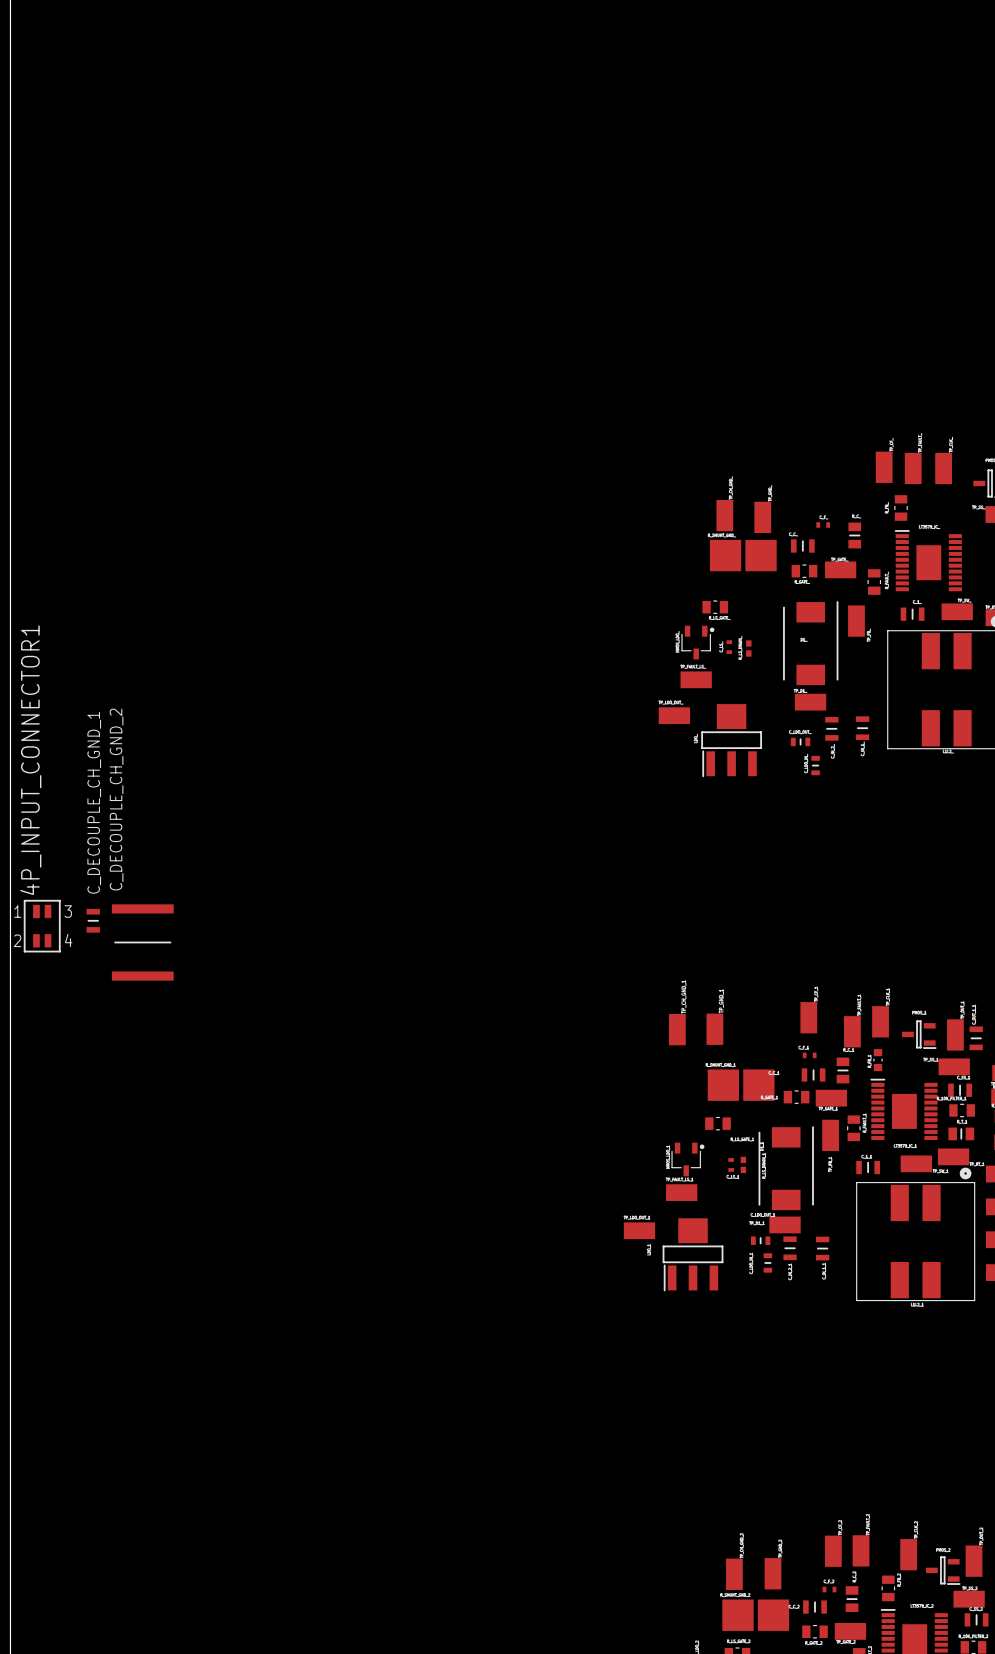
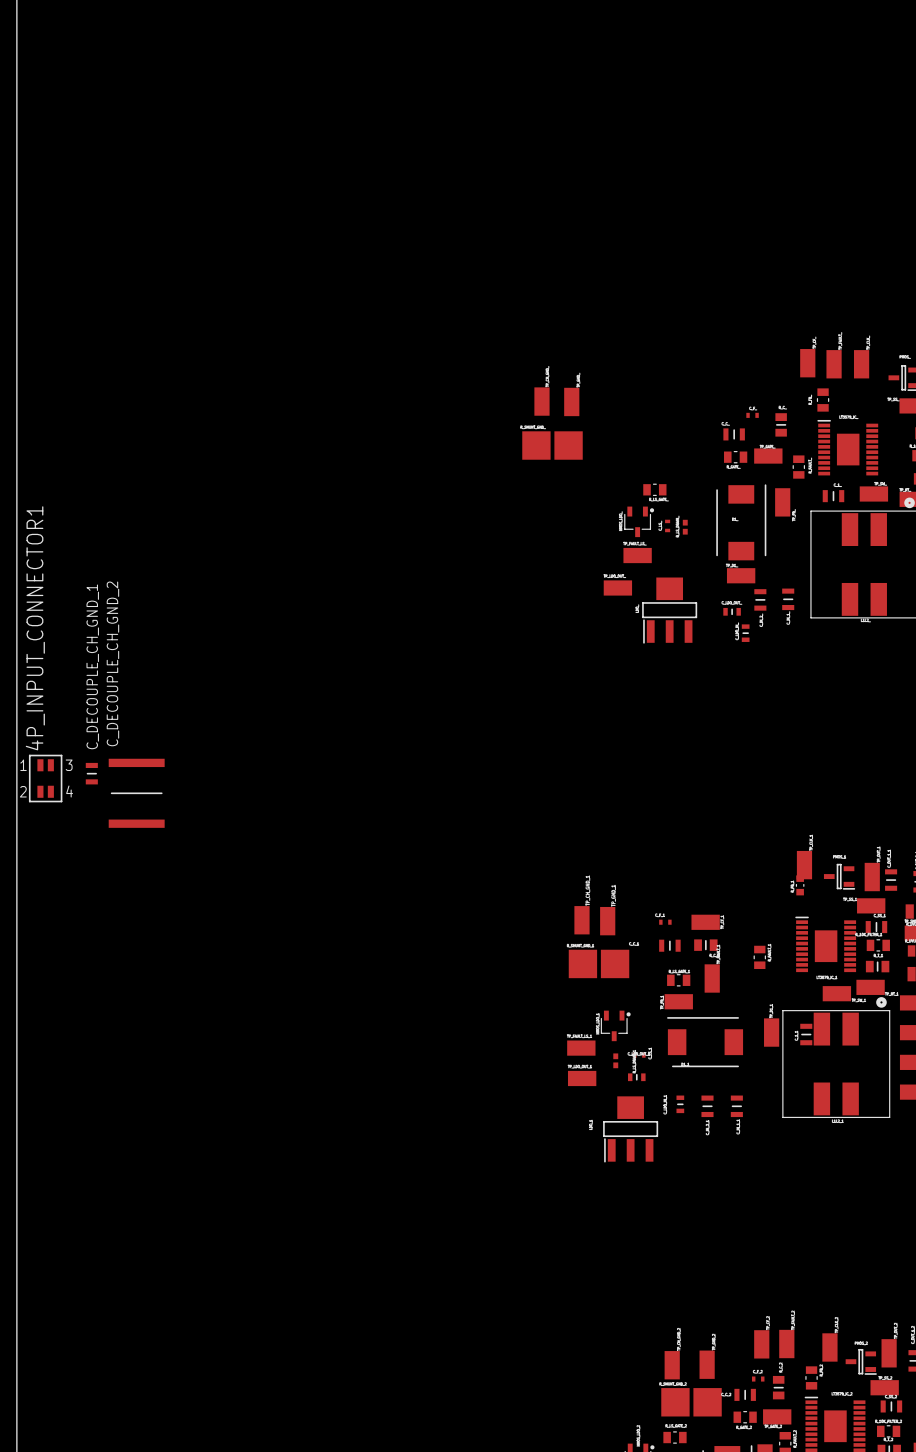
part position: (724, 515) -> (541, 401)
part position: (762, 517) -> (571, 401)
part position: (743, 555) -> (552, 445)
part rotation: 0° (808, 1017) -> 90° clockwise (705, 922)
part position: (808, 1017) -> (705, 922)
part position: (677, 1029) -> (581, 920)
part position: (714, 1029) -> (607, 921)
part position: (852, 1031) -> (712, 978)
part position: (809, 1055) -> (665, 922)
part position: (877, 1060) -> (800, 885)
part rotation: 0° (842, 1070) -> 90° clockwise (705, 945)
part position: (842, 1070) -> (705, 945)
part position: (813, 1075) -> (669, 945)
part position: (741, 1085) -> (599, 963)
part: (796, 1097) -> none
part: (831, 1098) -> none
part position: (717, 1123) -> (678, 980)
part position: (853, 1128) -> (759, 957)
part rotation: 0° (830, 1135) -> 90° clockwise (678, 1001)
part position: (830, 1135) -> (678, 1001)
part position: (687, 1159) -> (615, 1025)
part rotation: 0° (731, 1164) -> 90° clockwise (639, 1055)
part position: (731, 1164) -> (639, 1055)
part position: (743, 1164) -> (615, 1060)
part rotation: 0° (868, 1167) -> 90° clockwise (806, 1034)
part position: (868, 1167) -> (806, 1034)
part rotation: 0° (786, 1168) -> 90° counterclockwise (705, 1042)
part position: (786, 1168) -> (705, 1042)
part position: (681, 1192) -> (581, 1048)
part rotation: 0° (785, 1224) -> 90° clockwise (771, 1032)
part position: (785, 1224) -> (771, 1032)
part position: (639, 1230) -> (582, 1078)
part position: (760, 1240) -> (636, 1077)
part position: (790, 1248) -> (707, 1106)
part position: (822, 1248) -> (736, 1106)
part position: (693, 1254) -> (630, 1129)
part position: (767, 1262) -> (680, 1104)

